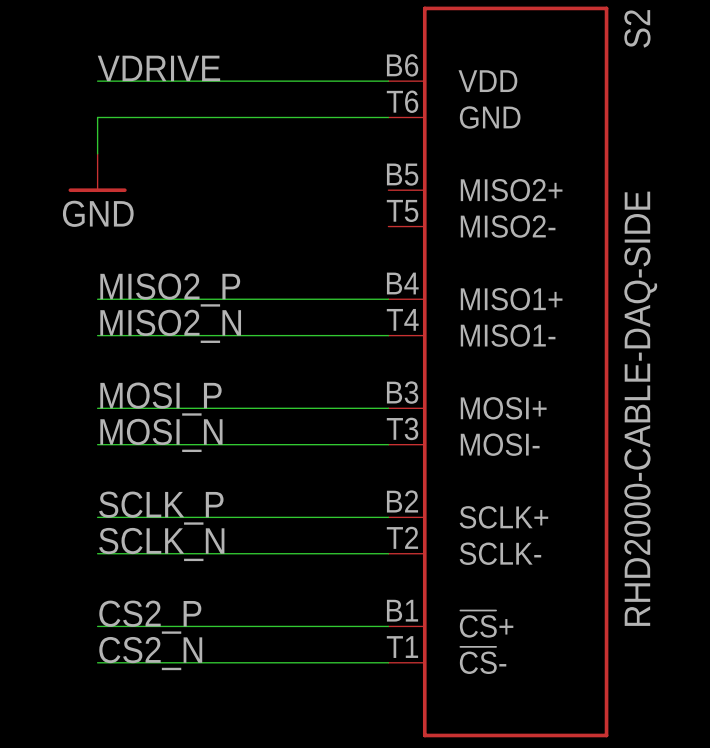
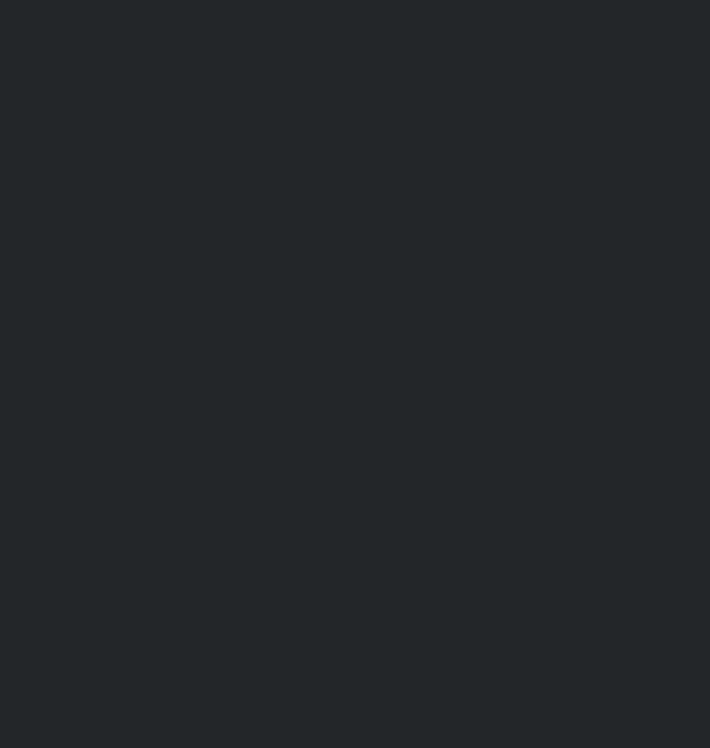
label: VDRIVE (158, 68) -> none
wire: (97, 81) (388, 81) -> none
wire: (388, 117) (97, 117) (97, 153) -> none
power symbol: GND (97, 172) -> none
label: MISO2_P (170, 290) -> none
wire: (97, 299) (388, 299) -> none
label: MISO2_N (170, 326) -> none
wire: (97, 335) (388, 335) -> none
S2: RHD2000-CABLE-DAQ-SIDE (498, 371) -> none
label: MOSI_P (160, 399) -> none
wire: (97, 408) (388, 408) -> none
label: MOSI_N (161, 435) -> none
wire: (97, 444) (388, 444) -> none
label: SCLK_P (161, 508) -> none
wire: (97, 517) (388, 517) -> none
label: SCLK_N (161, 544) -> none
wire: (97, 553) (388, 553) -> none
label: CS2_P (150, 617) -> none
wire: (97, 626) (388, 626) -> none
label: CS2_N (150, 653) -> none
wire: (97, 662) (388, 662) -> none

